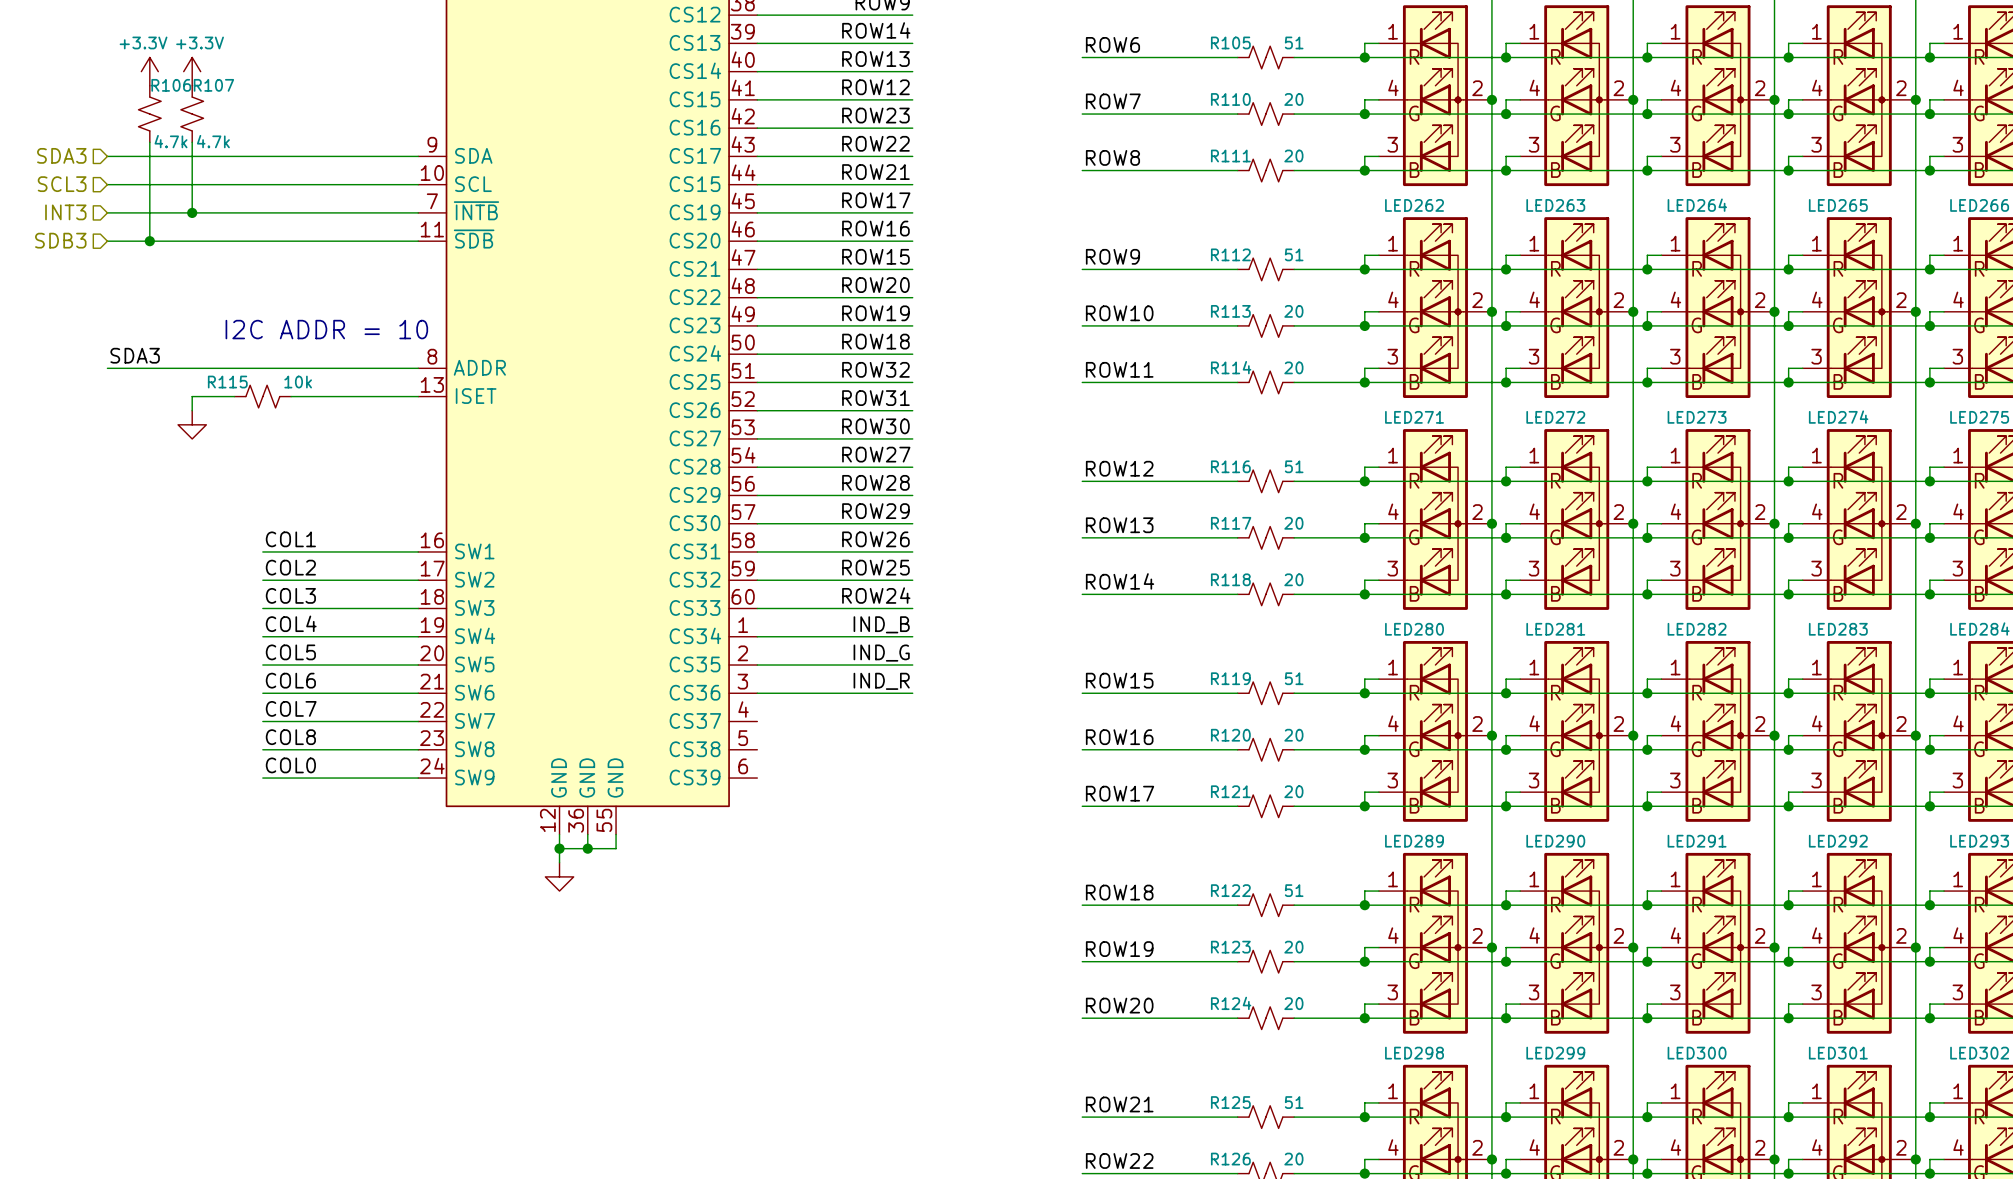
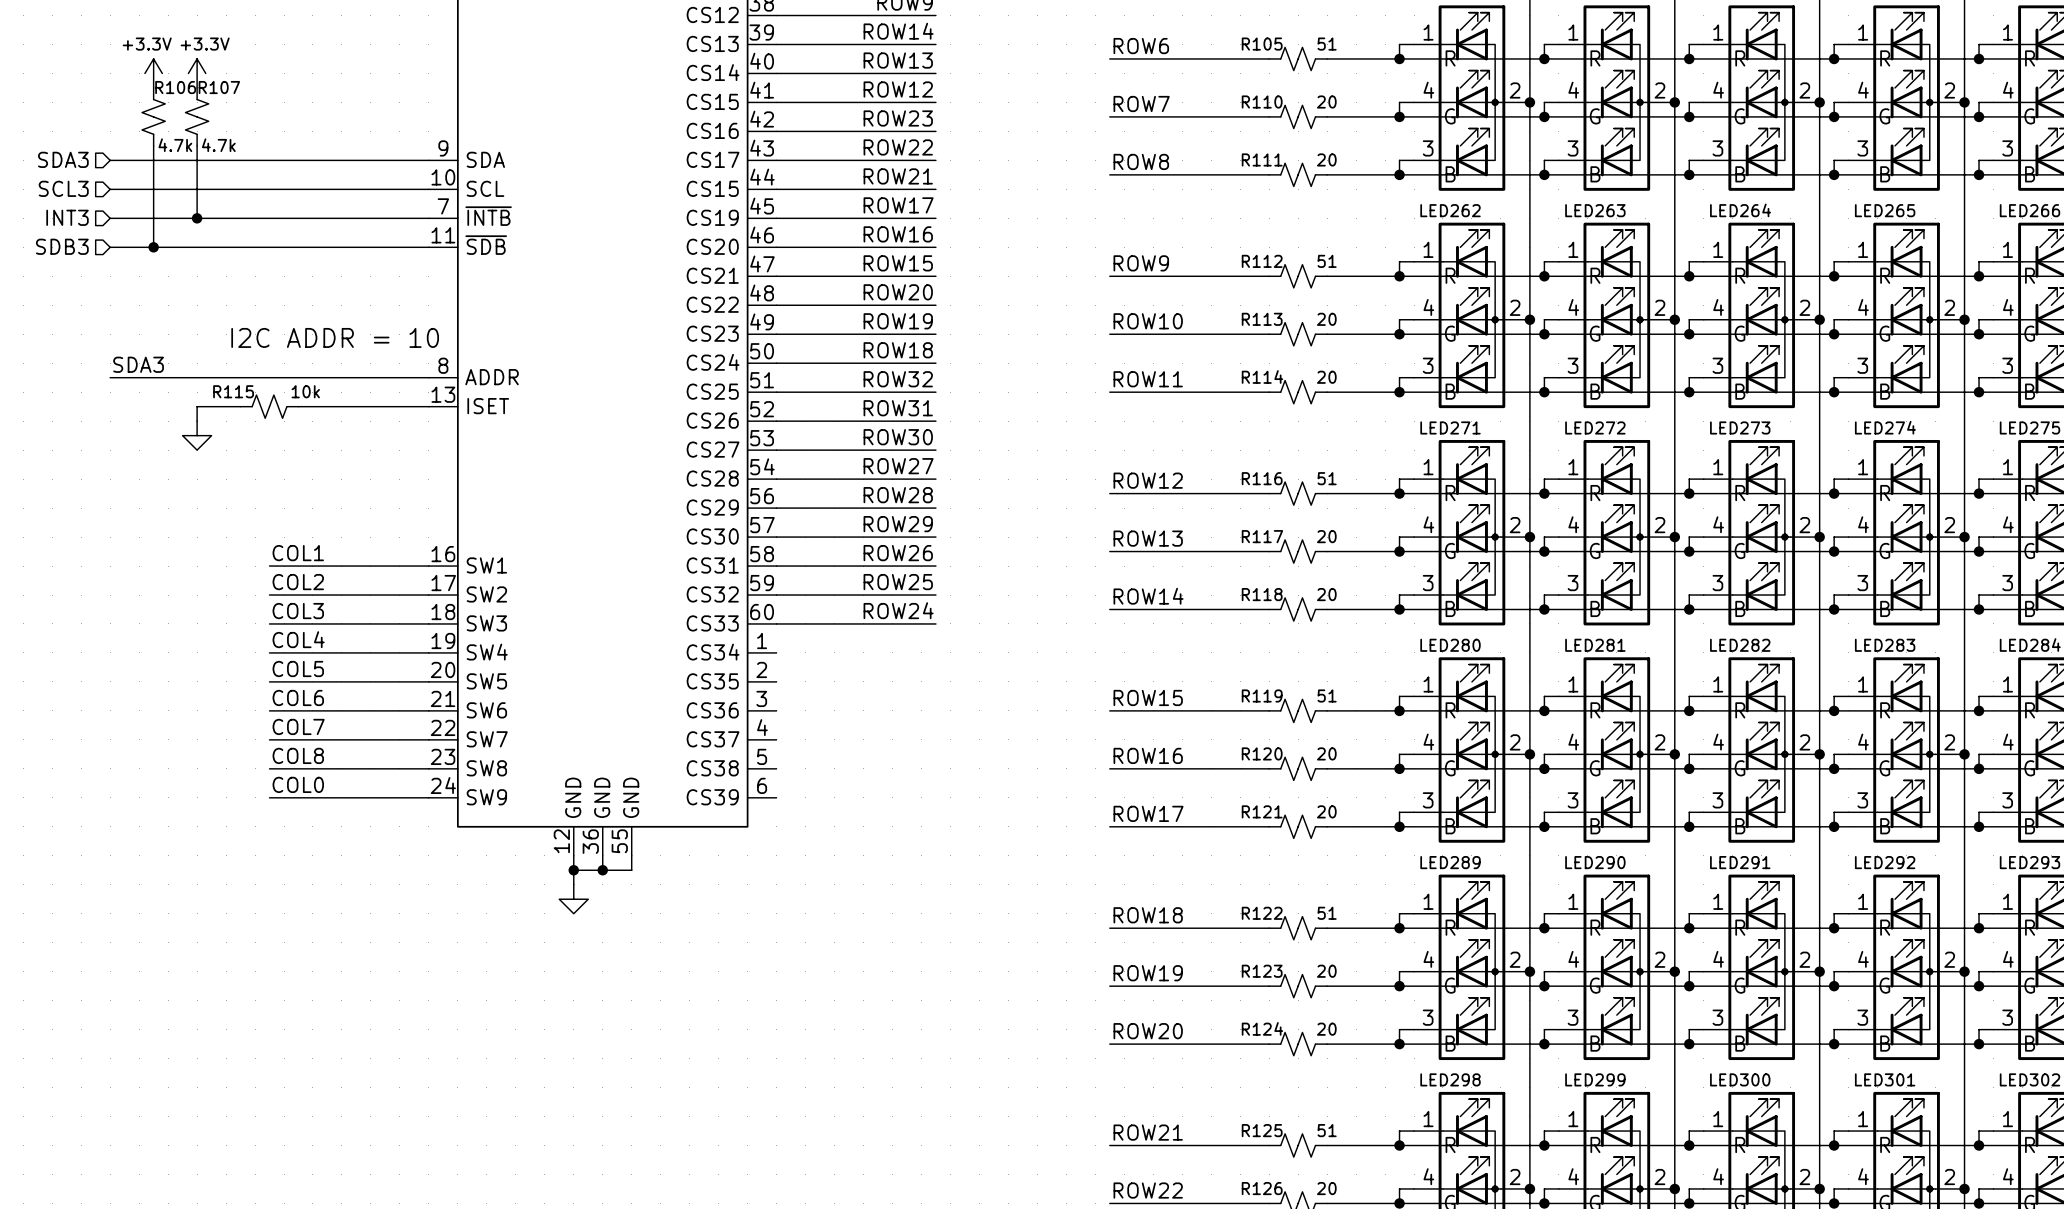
label: IND_B (881, 624) -> none
wire: (757, 636) (912, 636) -> none
label: IND_G (881, 653) -> none
wire: (757, 665) (912, 665) -> none
label: IND_R (881, 681) -> none
wire: (757, 693) (912, 693) -> none

